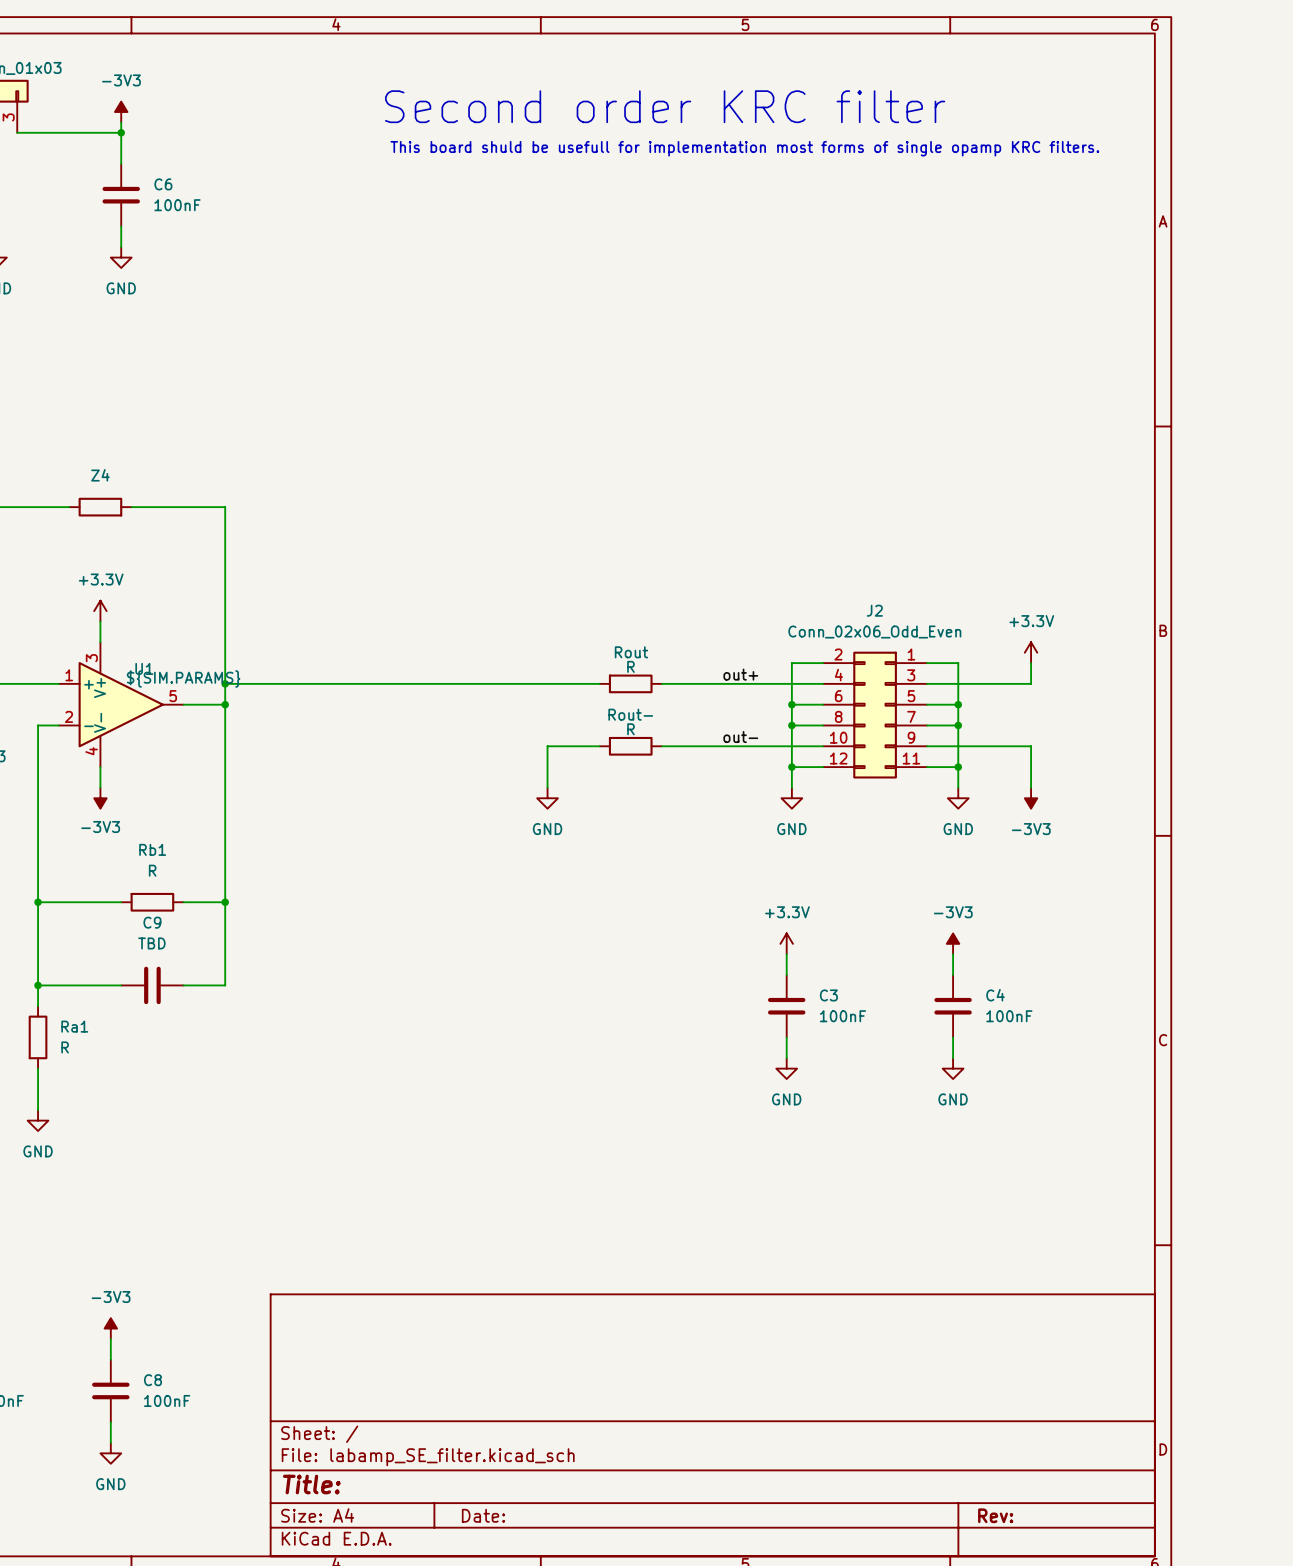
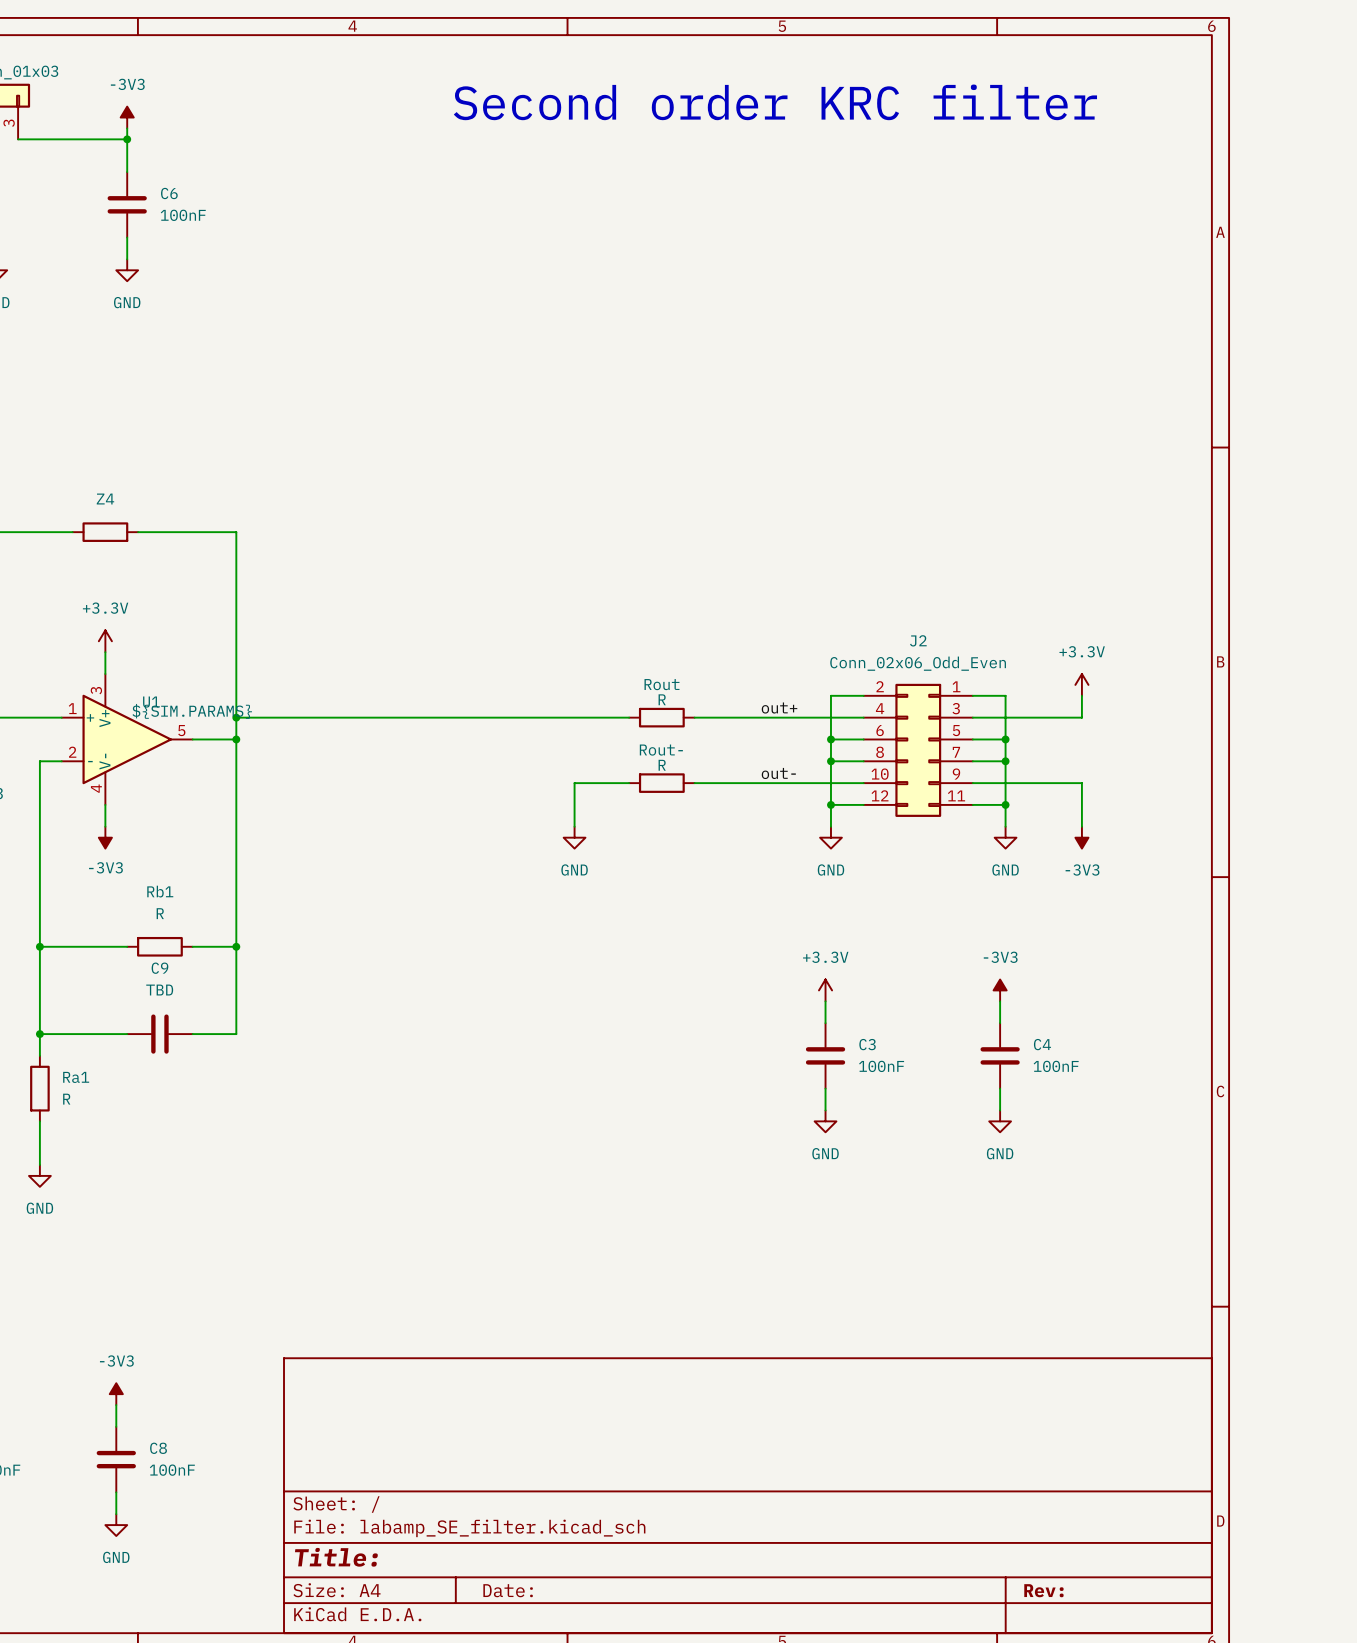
text: none -> Second order KRC filter (775, 102)
text: Second order KRC filter (665, 106) -> none
text: This board shuld be usefull for implementation most forms of single opamp KRC filters. (744, 148) -> none

